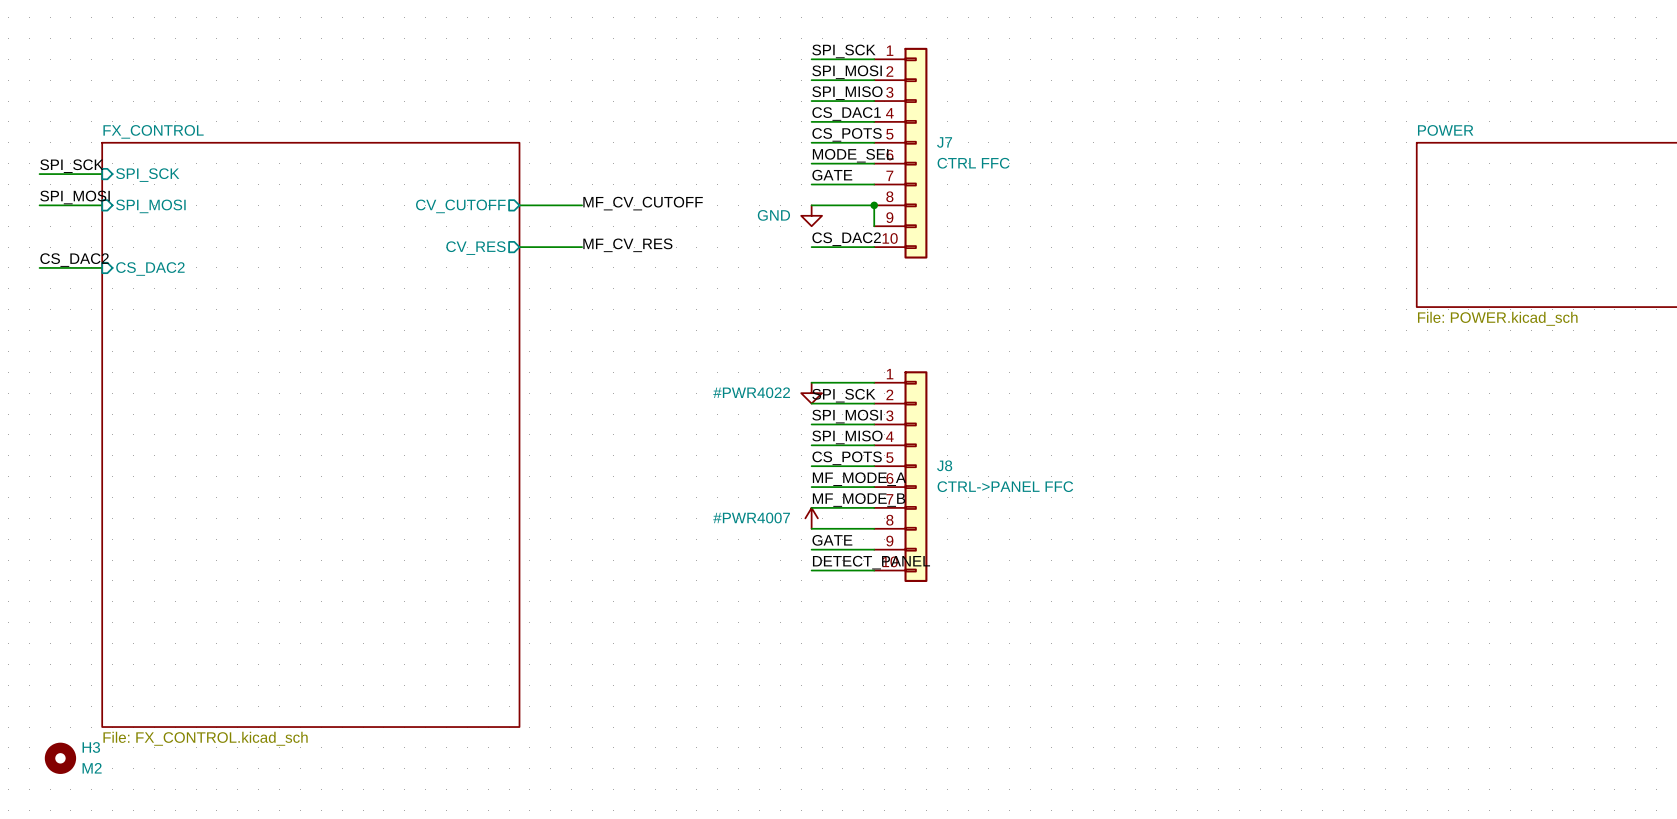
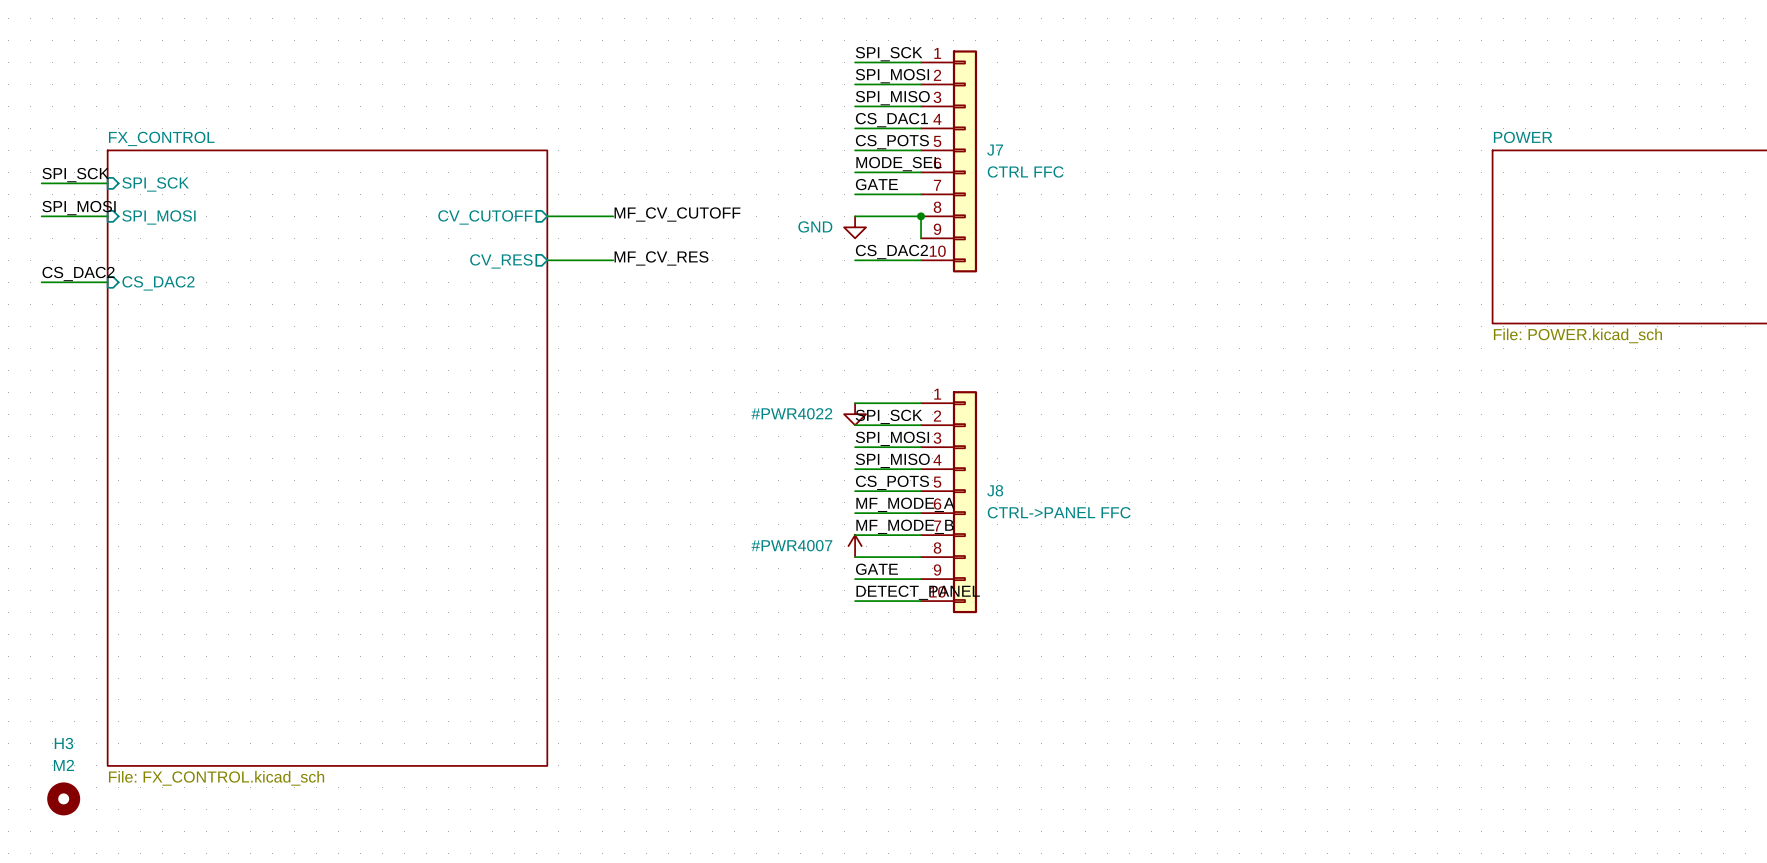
H3 name position: H3 (91, 747) -> H3 (63, 743)
H3 value position: M2 (92, 768) -> M2 (63, 765)

